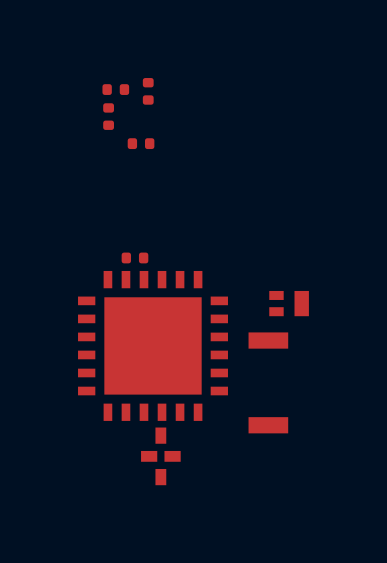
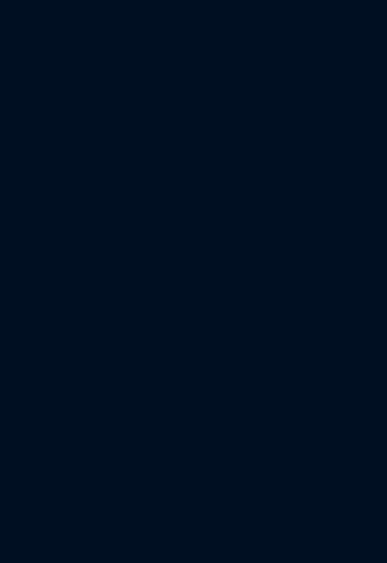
part: (115, 89) -> none
part: (148, 91) -> none
part: (108, 116) -> none
part: (141, 143) -> none
part: (134, 257) -> none
part: (289, 303) -> none
part: (153, 345) -> none
part: (268, 382) -> none
part: (160, 456) -> none

